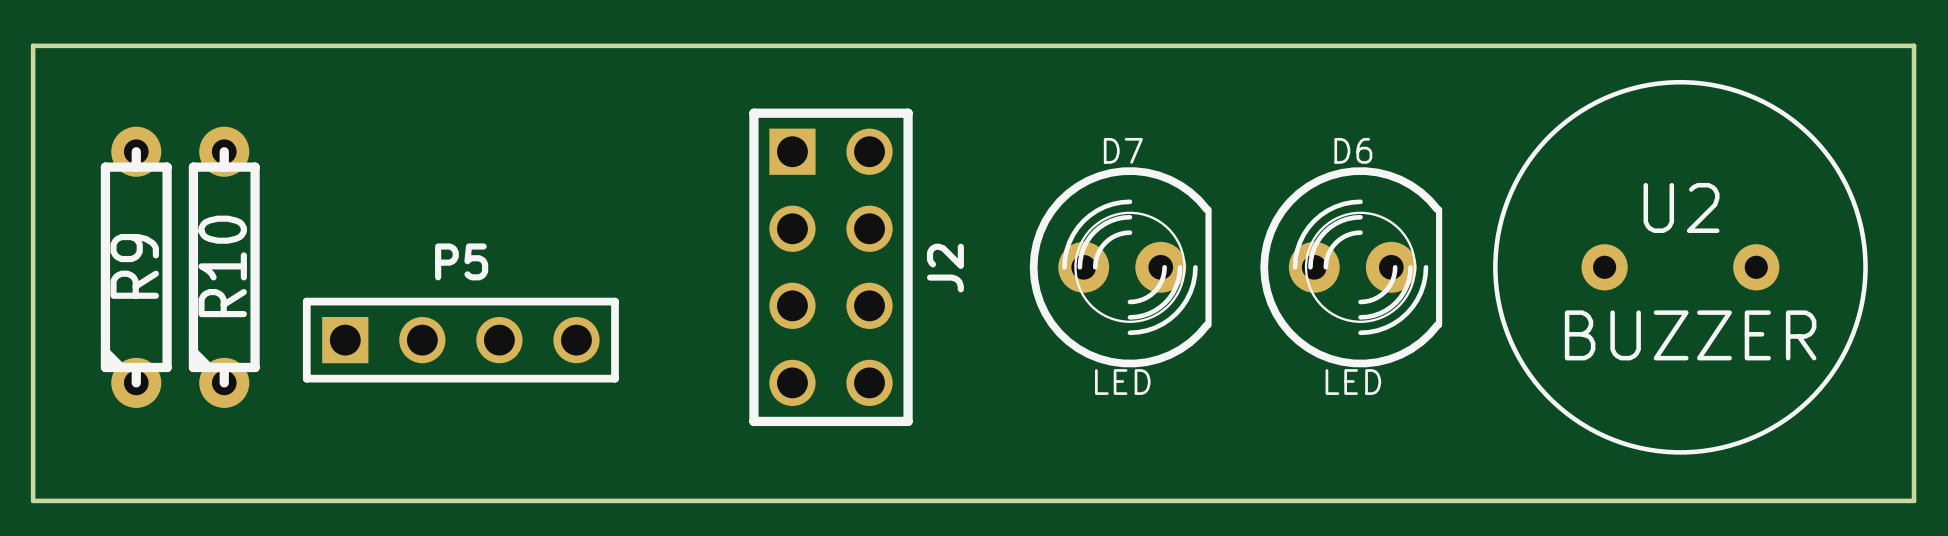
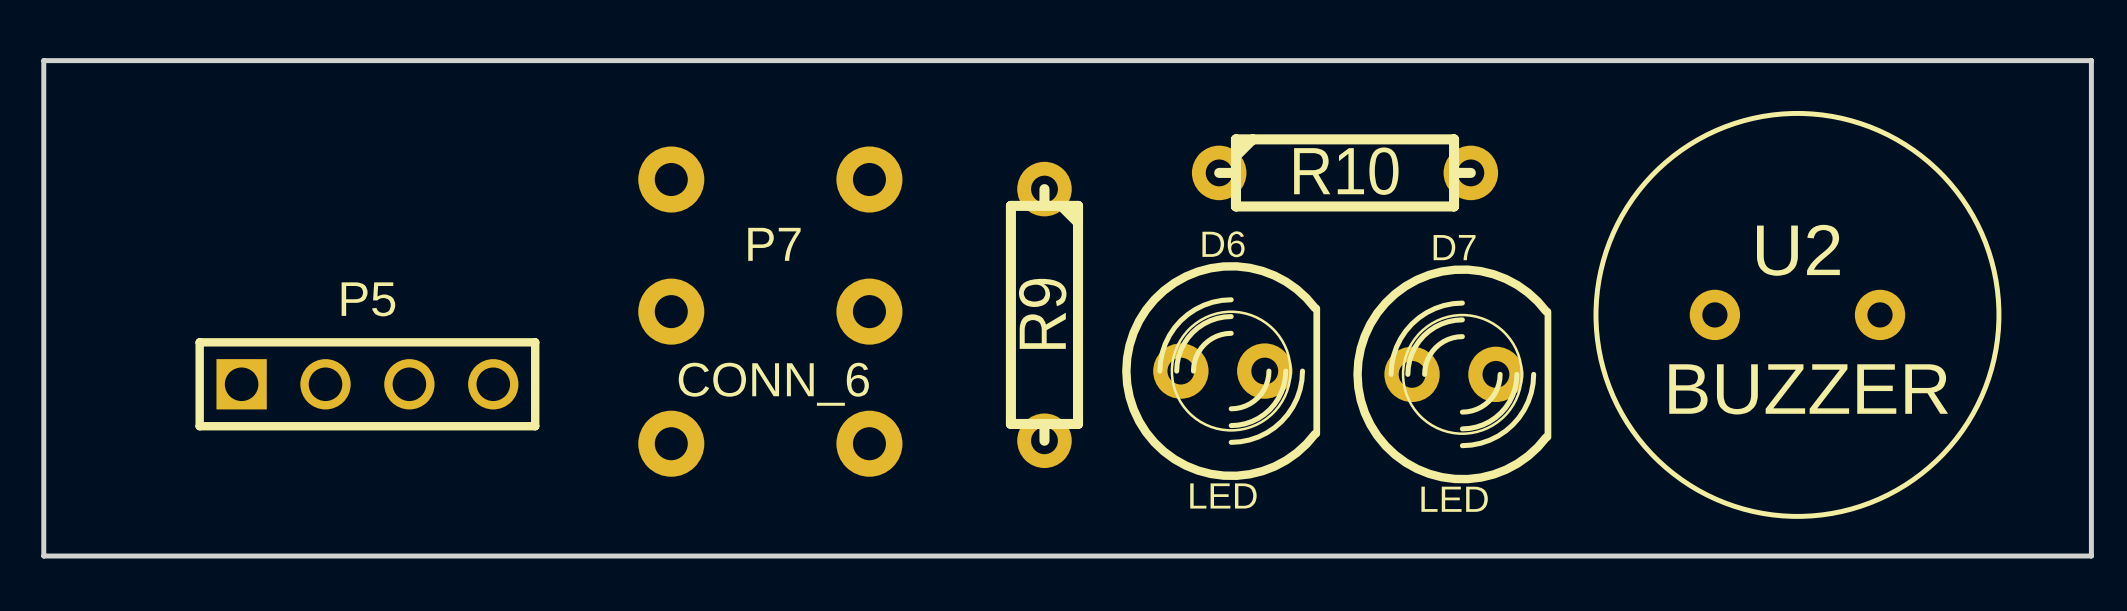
R9 rotation: 0° (136, 267) -> 180° (1044, 314)
R9 position: (136, 267) -> (1044, 314)
R10 rotation: 0° (224, 267) -> 90° clockwise (1345, 172)
R10 position: (224, 267) -> (1345, 172)
J2: (831, 267) -> none
D7 position: (1120, 267) -> (1452, 374)
D6 position: (1351, 267) -> (1221, 371)
U2 position: (1680, 267) -> (1797, 314)
P7: none -> CONN_6 (770, 311)
P5 position: (460, 340) -> (367, 384)

